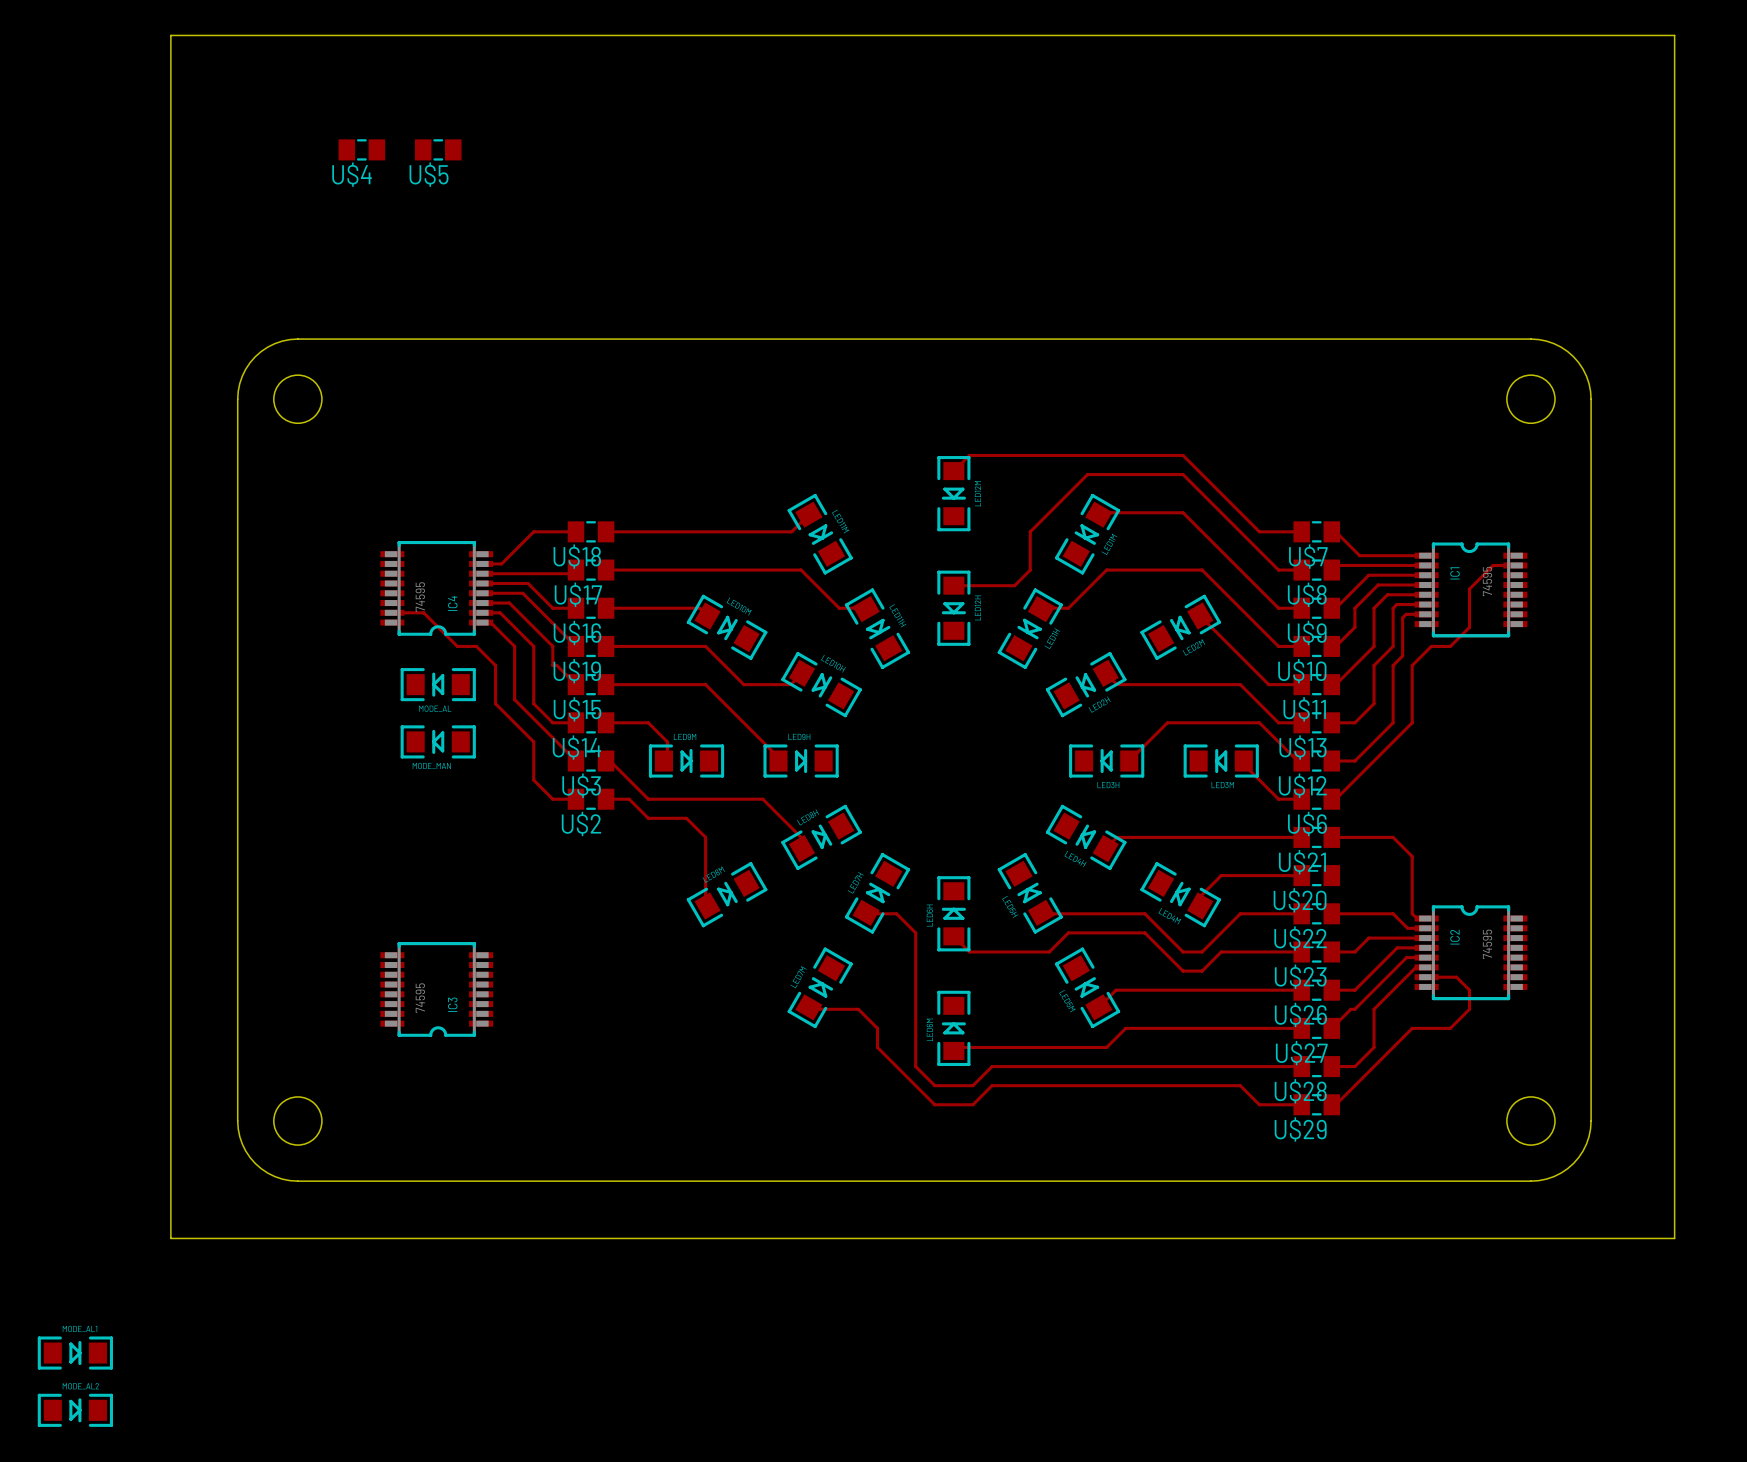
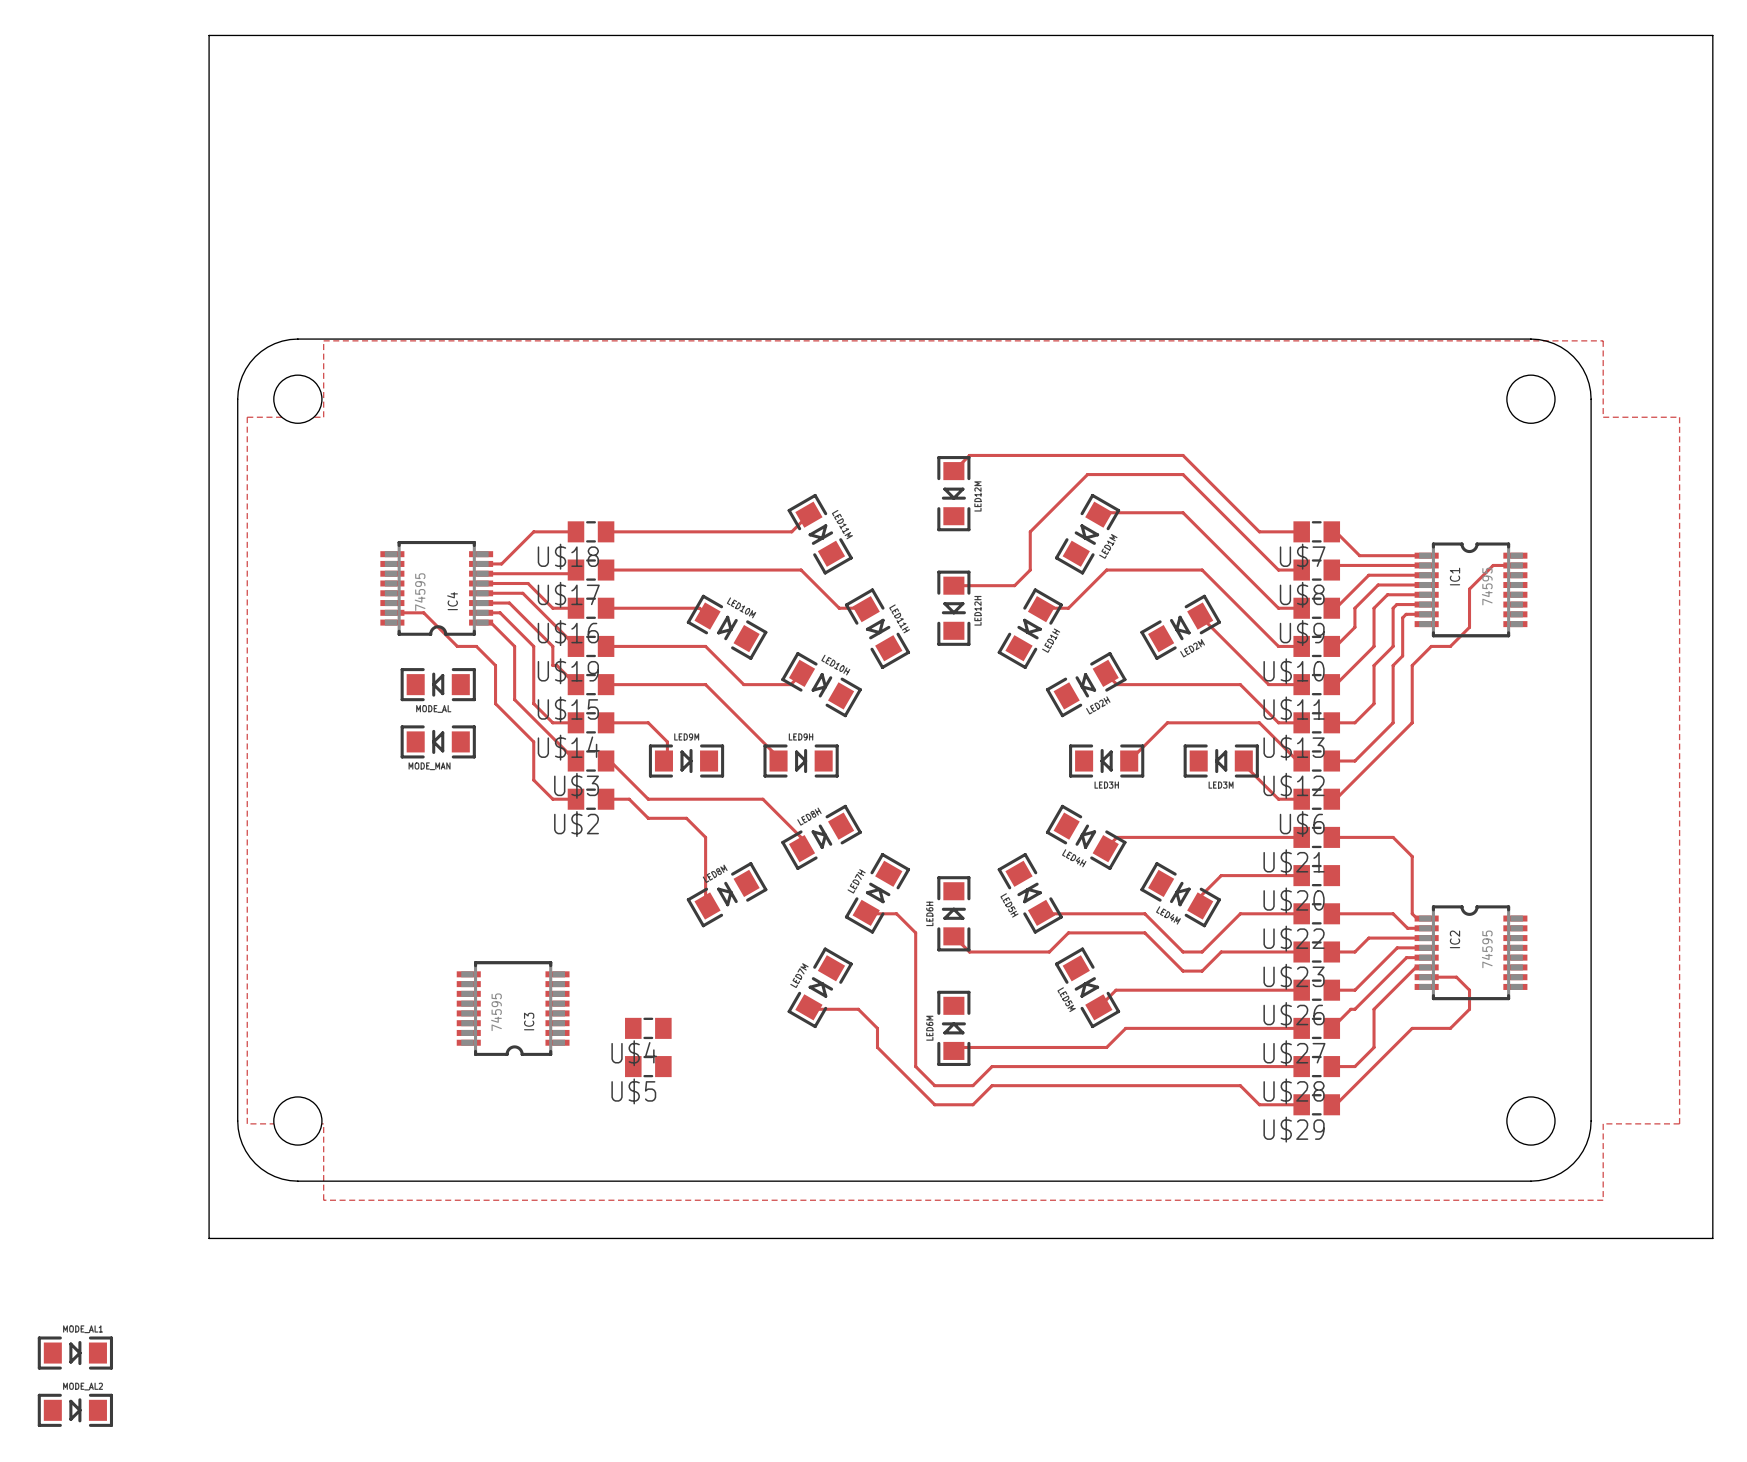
board edge: (209, 35) (170, 35) (170, 1238) (209, 1238) -> (209, 35) (209, 1238)
board edge: (1674, 35) (1674, 1238) -> (1674, 35) (1712, 35) (1712, 1238) (1674, 1238)
U$4 position: (361, 149) -> (648, 1028)
U$5 position: (438, 149) -> (648, 1066)
zone outline: none -> (323, 340) (323, 417) (247, 417) (247, 1123) (323, 1123) (323, 1200) (1603, 1200) (1603, 1123) (1679, 1123) (1679, 417) (1603, 417) (1603, 340) (323, 340)
IC3 position: (436, 989) -> (513, 1008)

